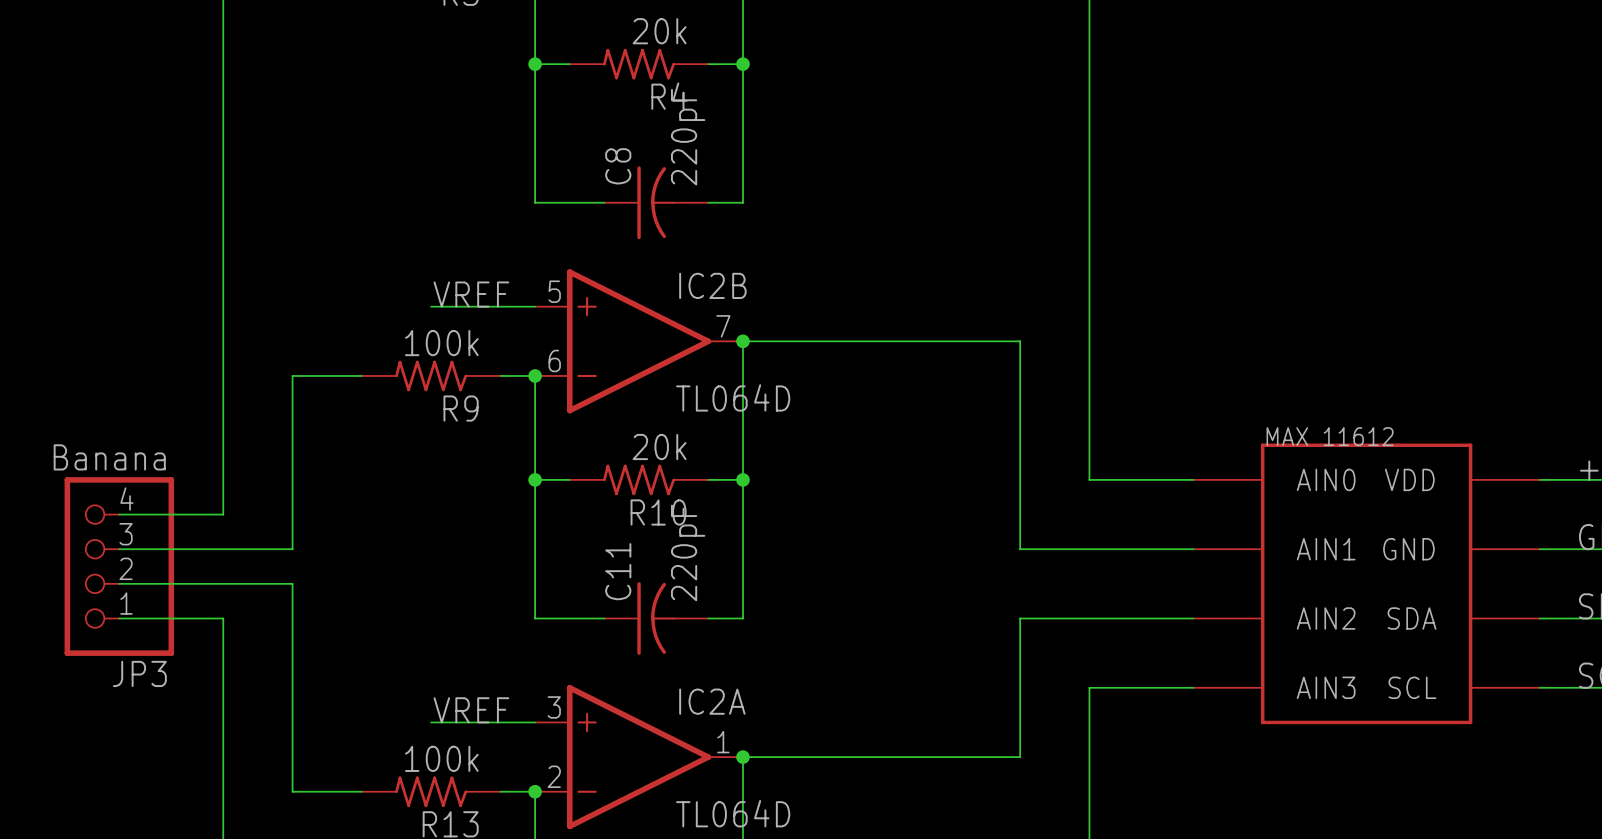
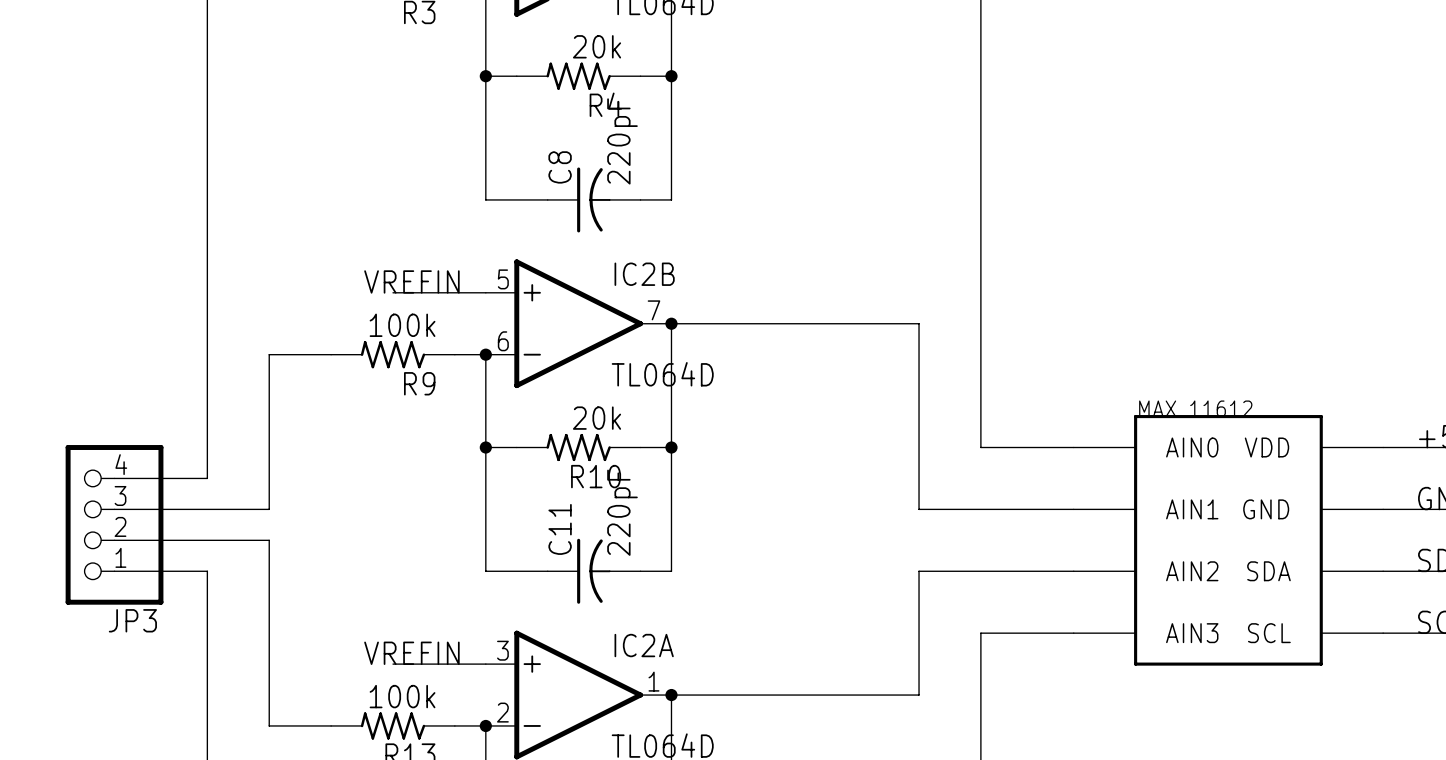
label: VREF (471, 294) -> VREFIN (411, 281)
JP3 value: Banana (109, 457) -> none
label: VREF (471, 710) -> VREFIN (411, 653)

